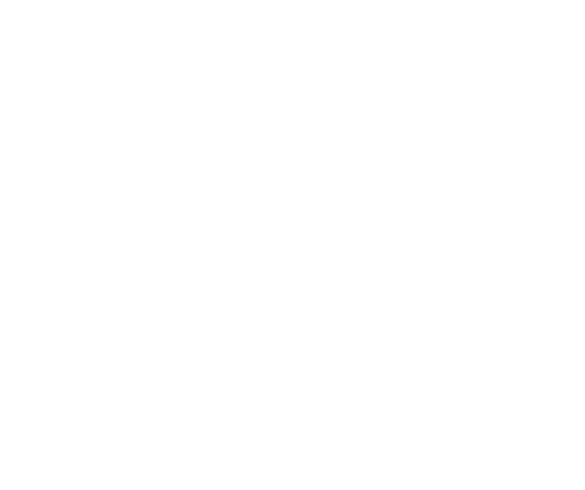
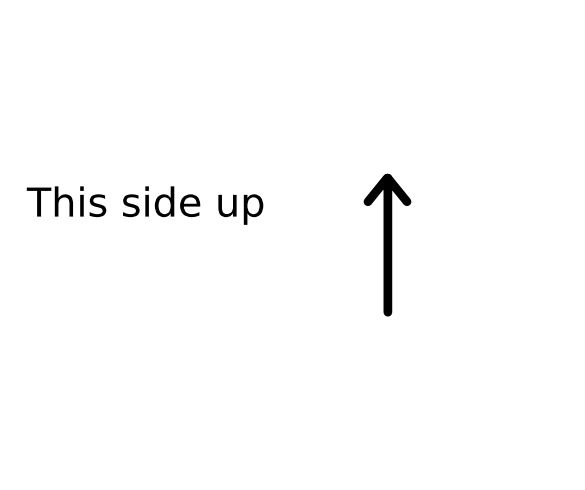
line: none -> (387, 178) (367, 201)
line: none -> (407, 201) (387, 178) (387, 312)
text: none -> This side up (145, 205)

